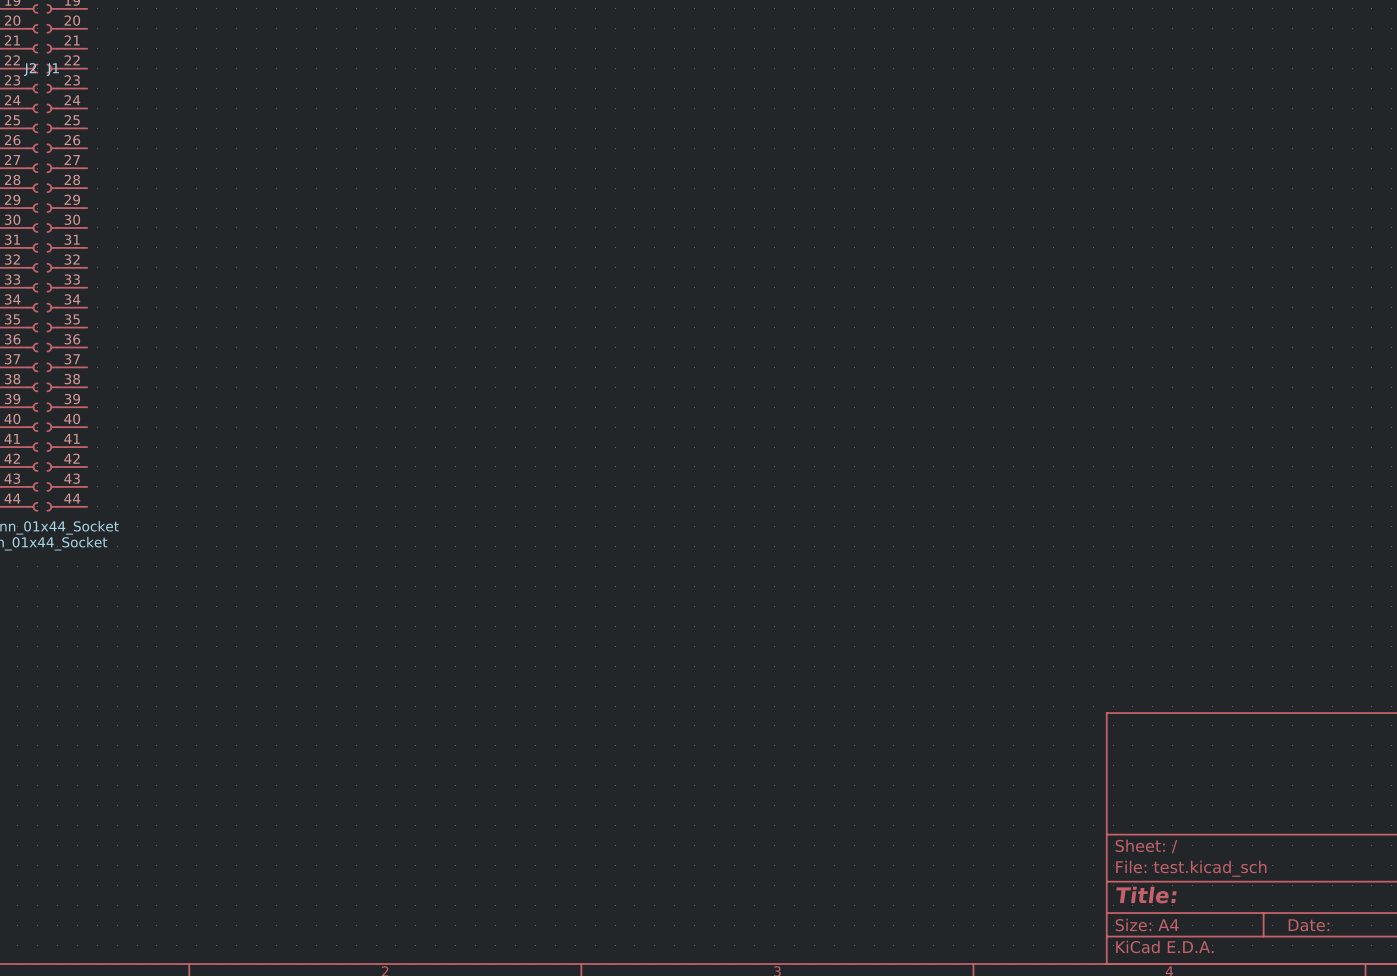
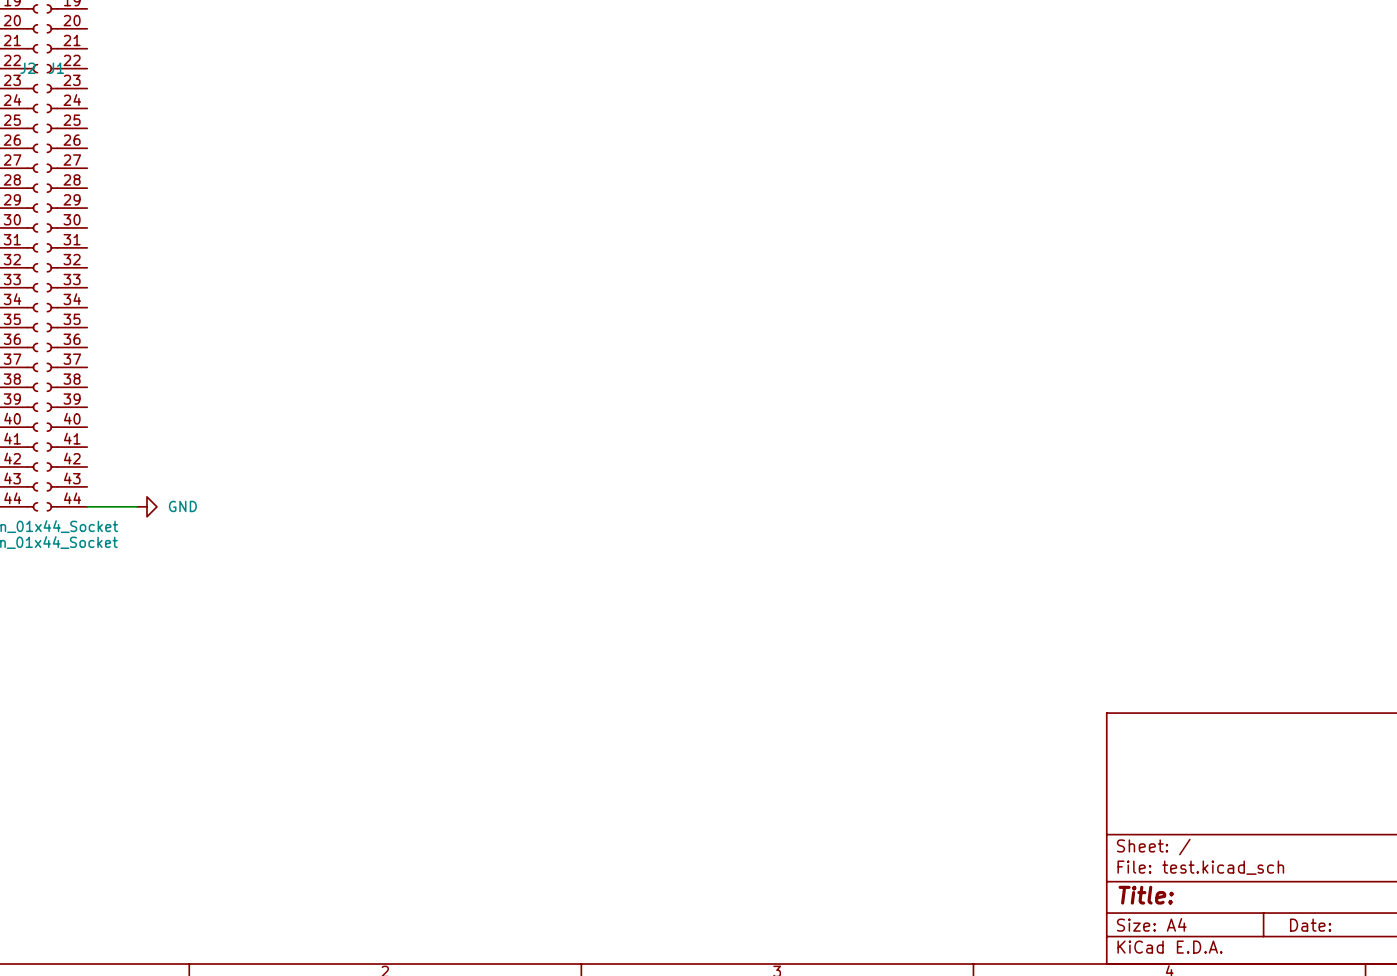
wire: none -> (87, 506) (137, 506)
power symbol: none -> GND (147, 506)

